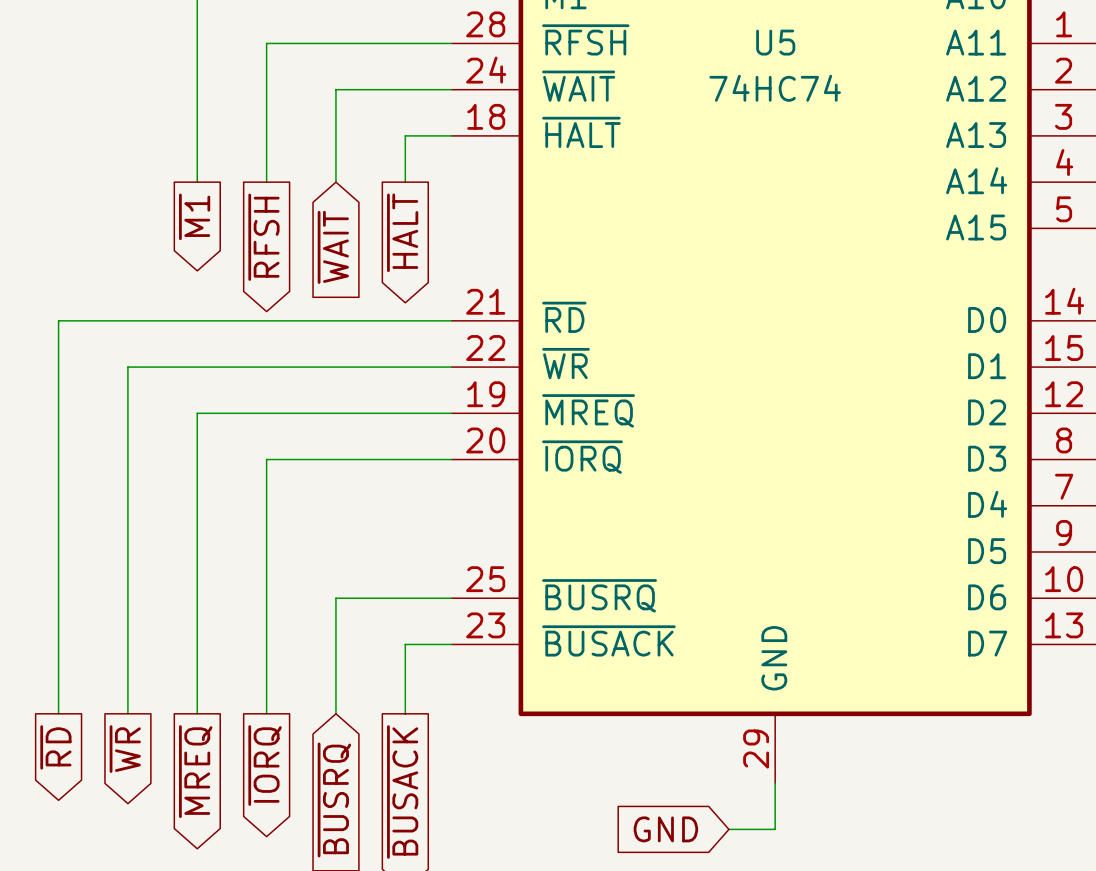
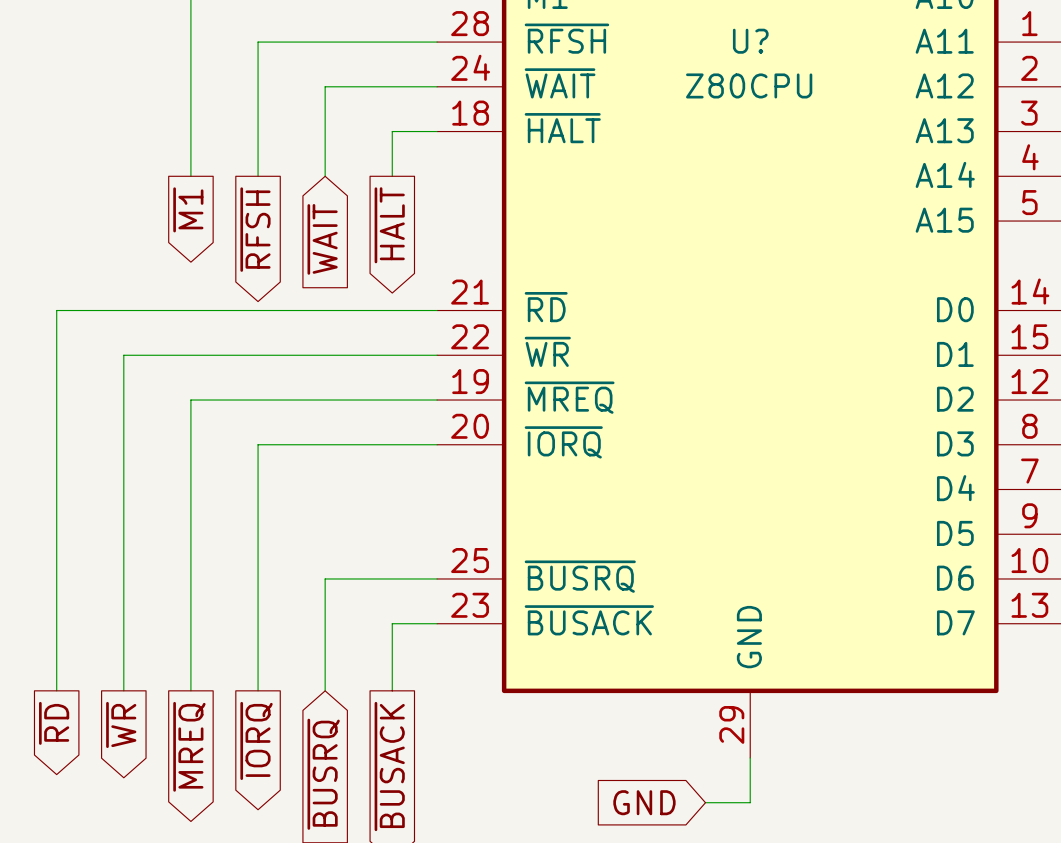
U5 name: U5 (775, 42) -> U? (750, 41)
U5 value: 74HC74 (775, 88) -> Z80CPU (749, 85)

